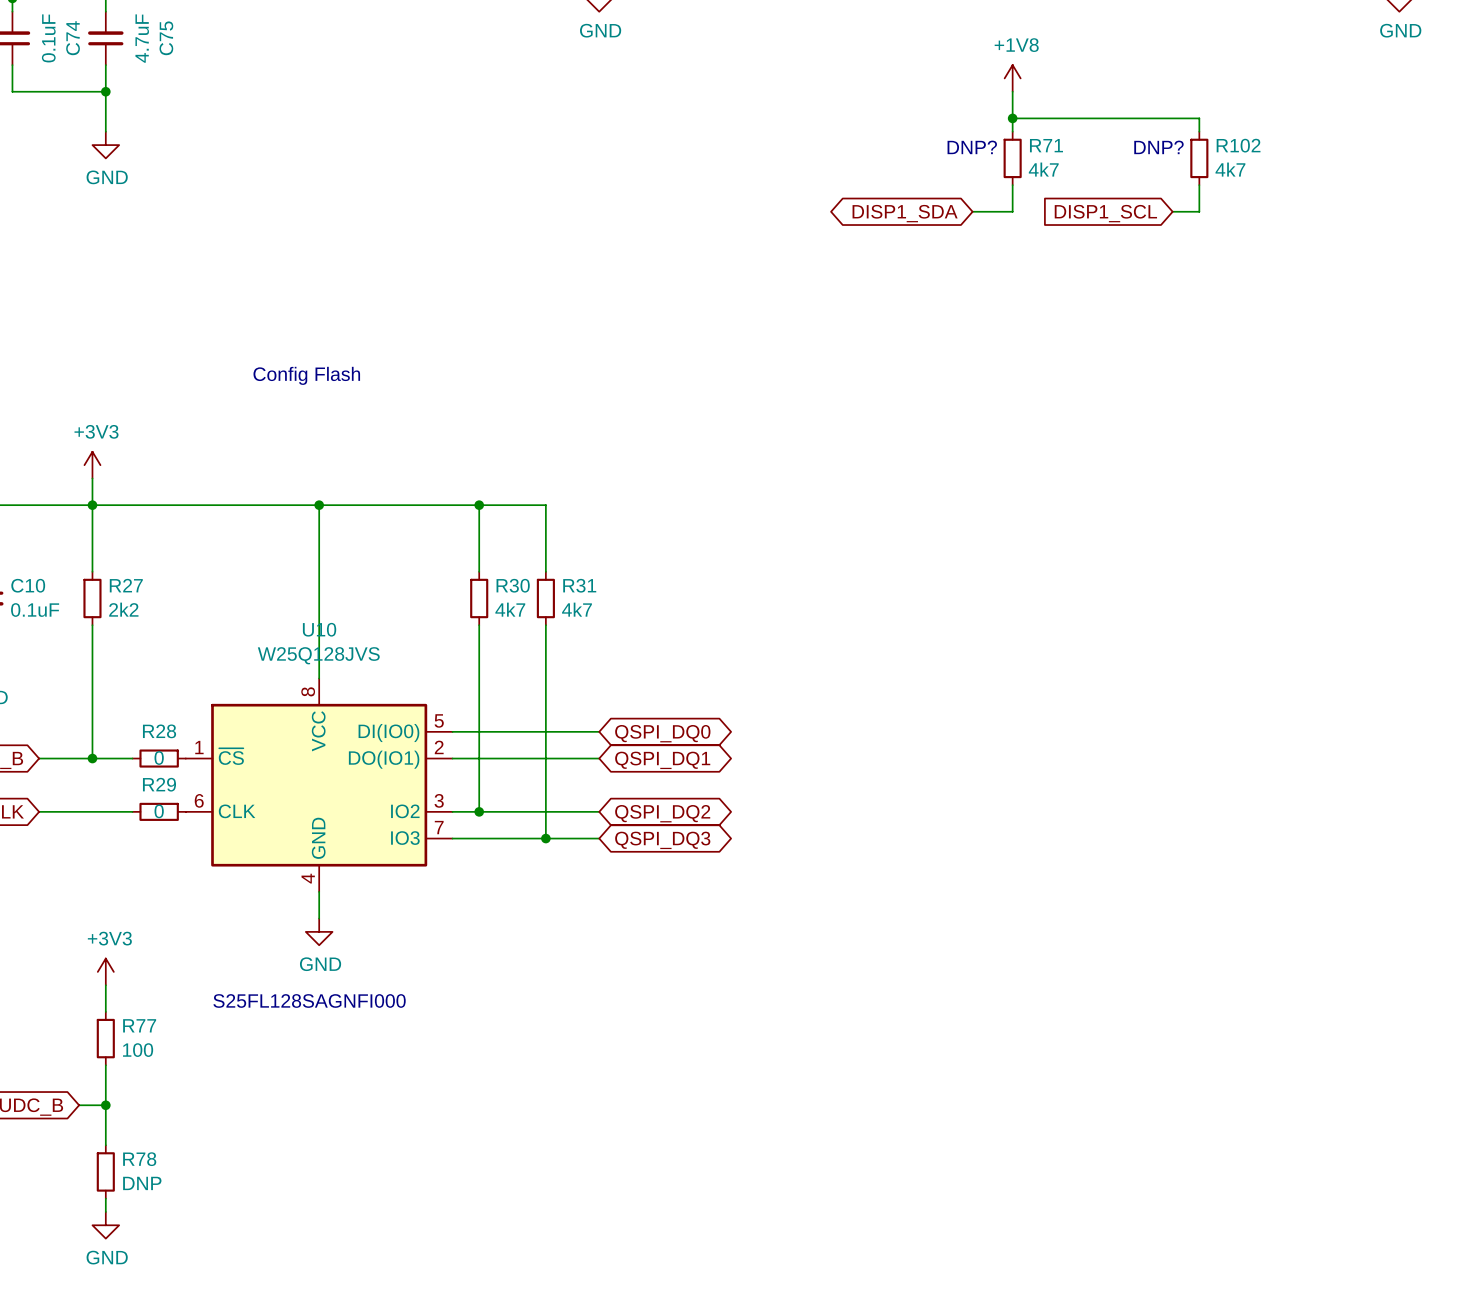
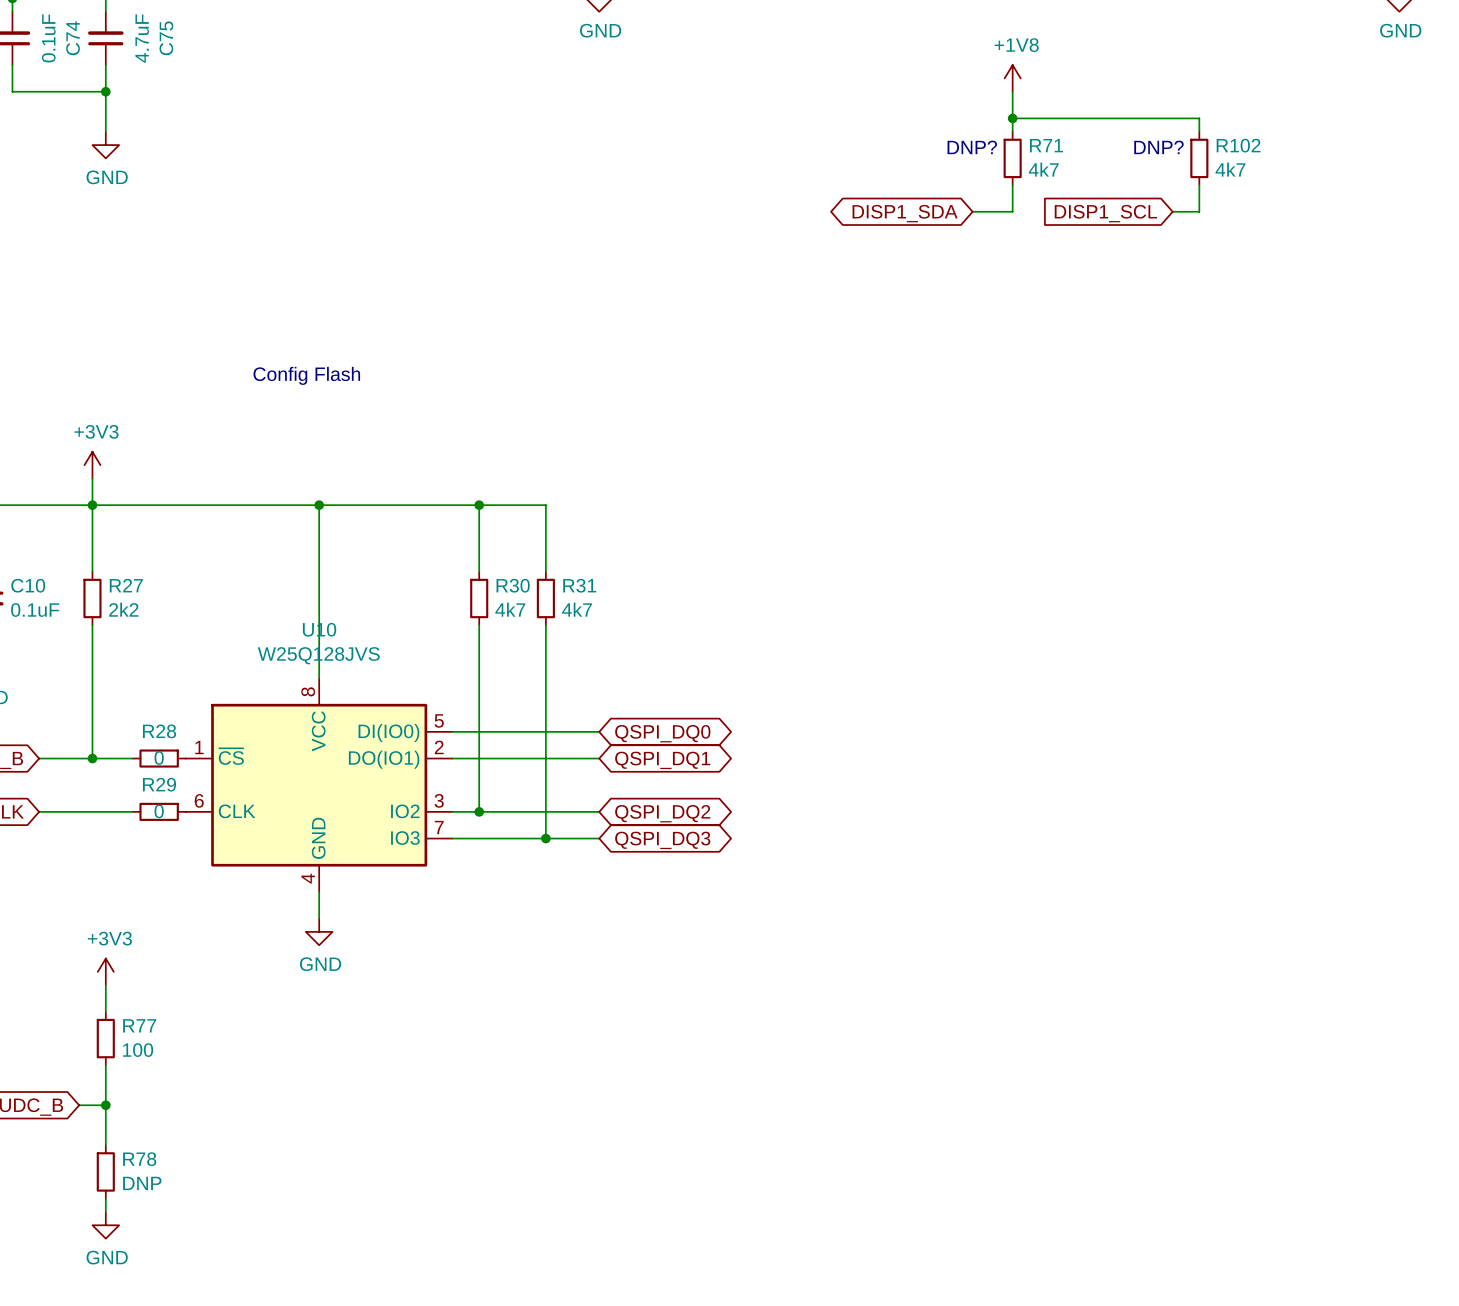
text: S25FL128SAGNFI000 (309, 1000) -> none

